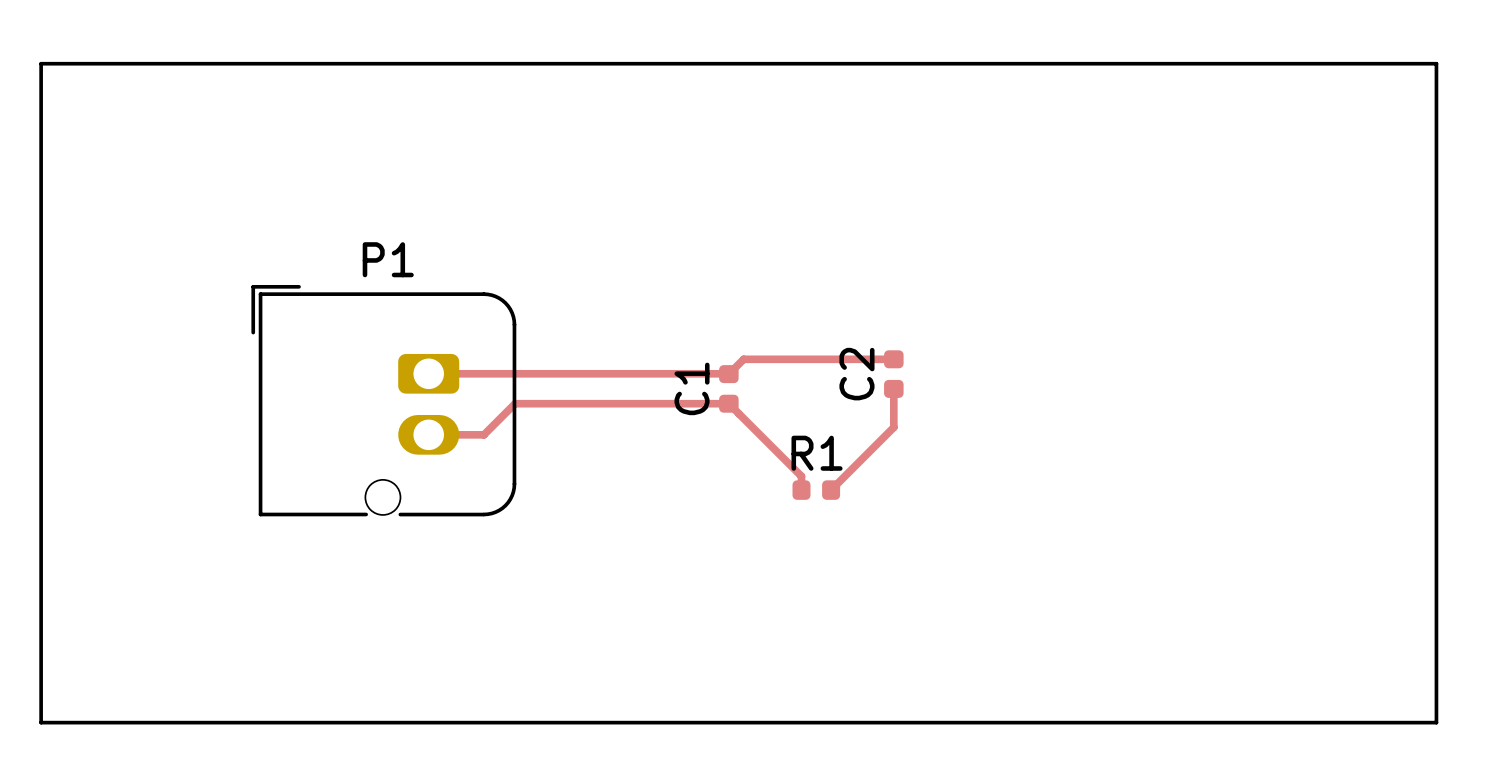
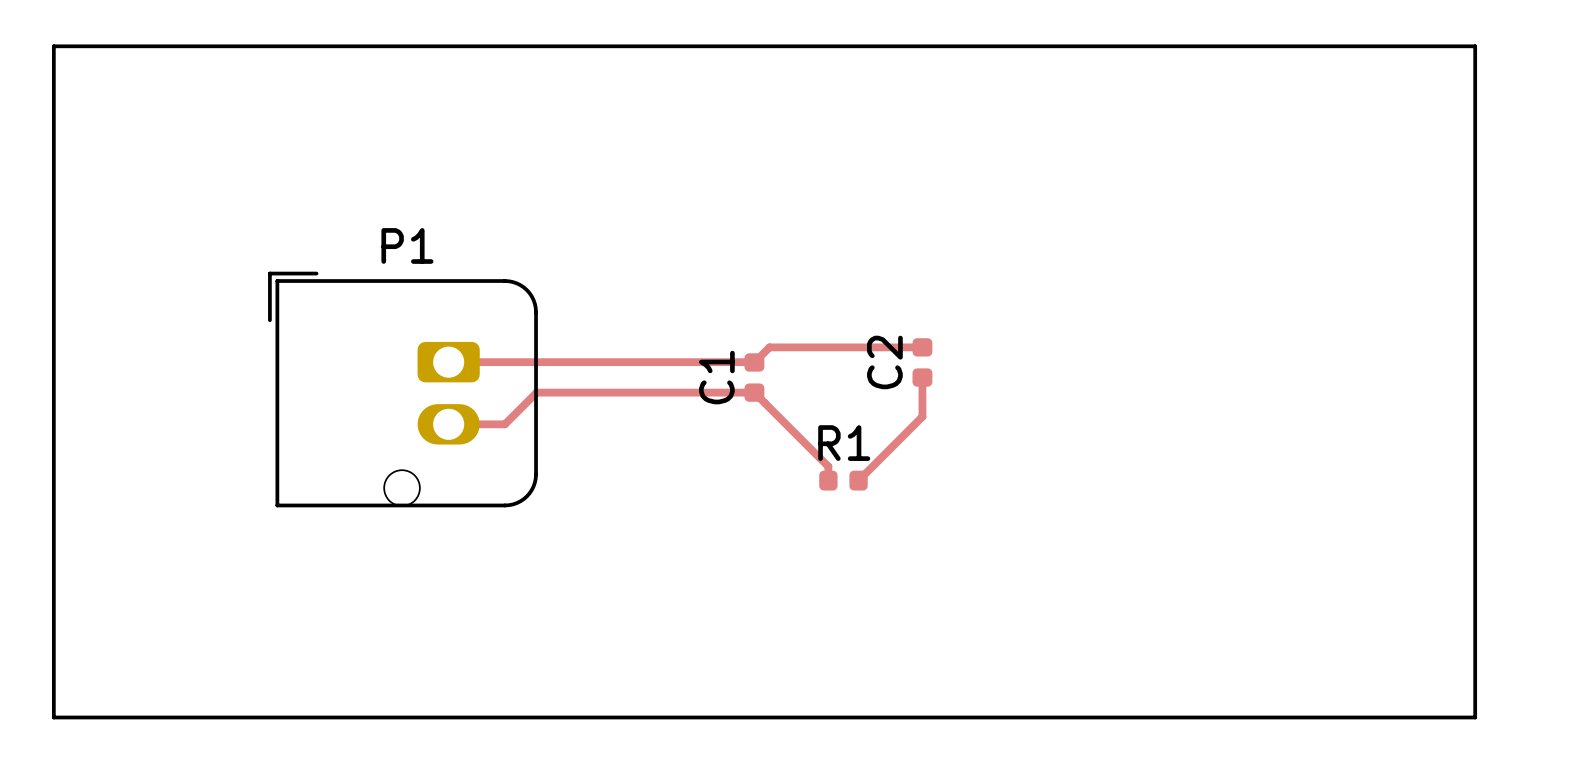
P1 footprint: [251, 284, 517, 517] -> [268, 271, 538, 508]

